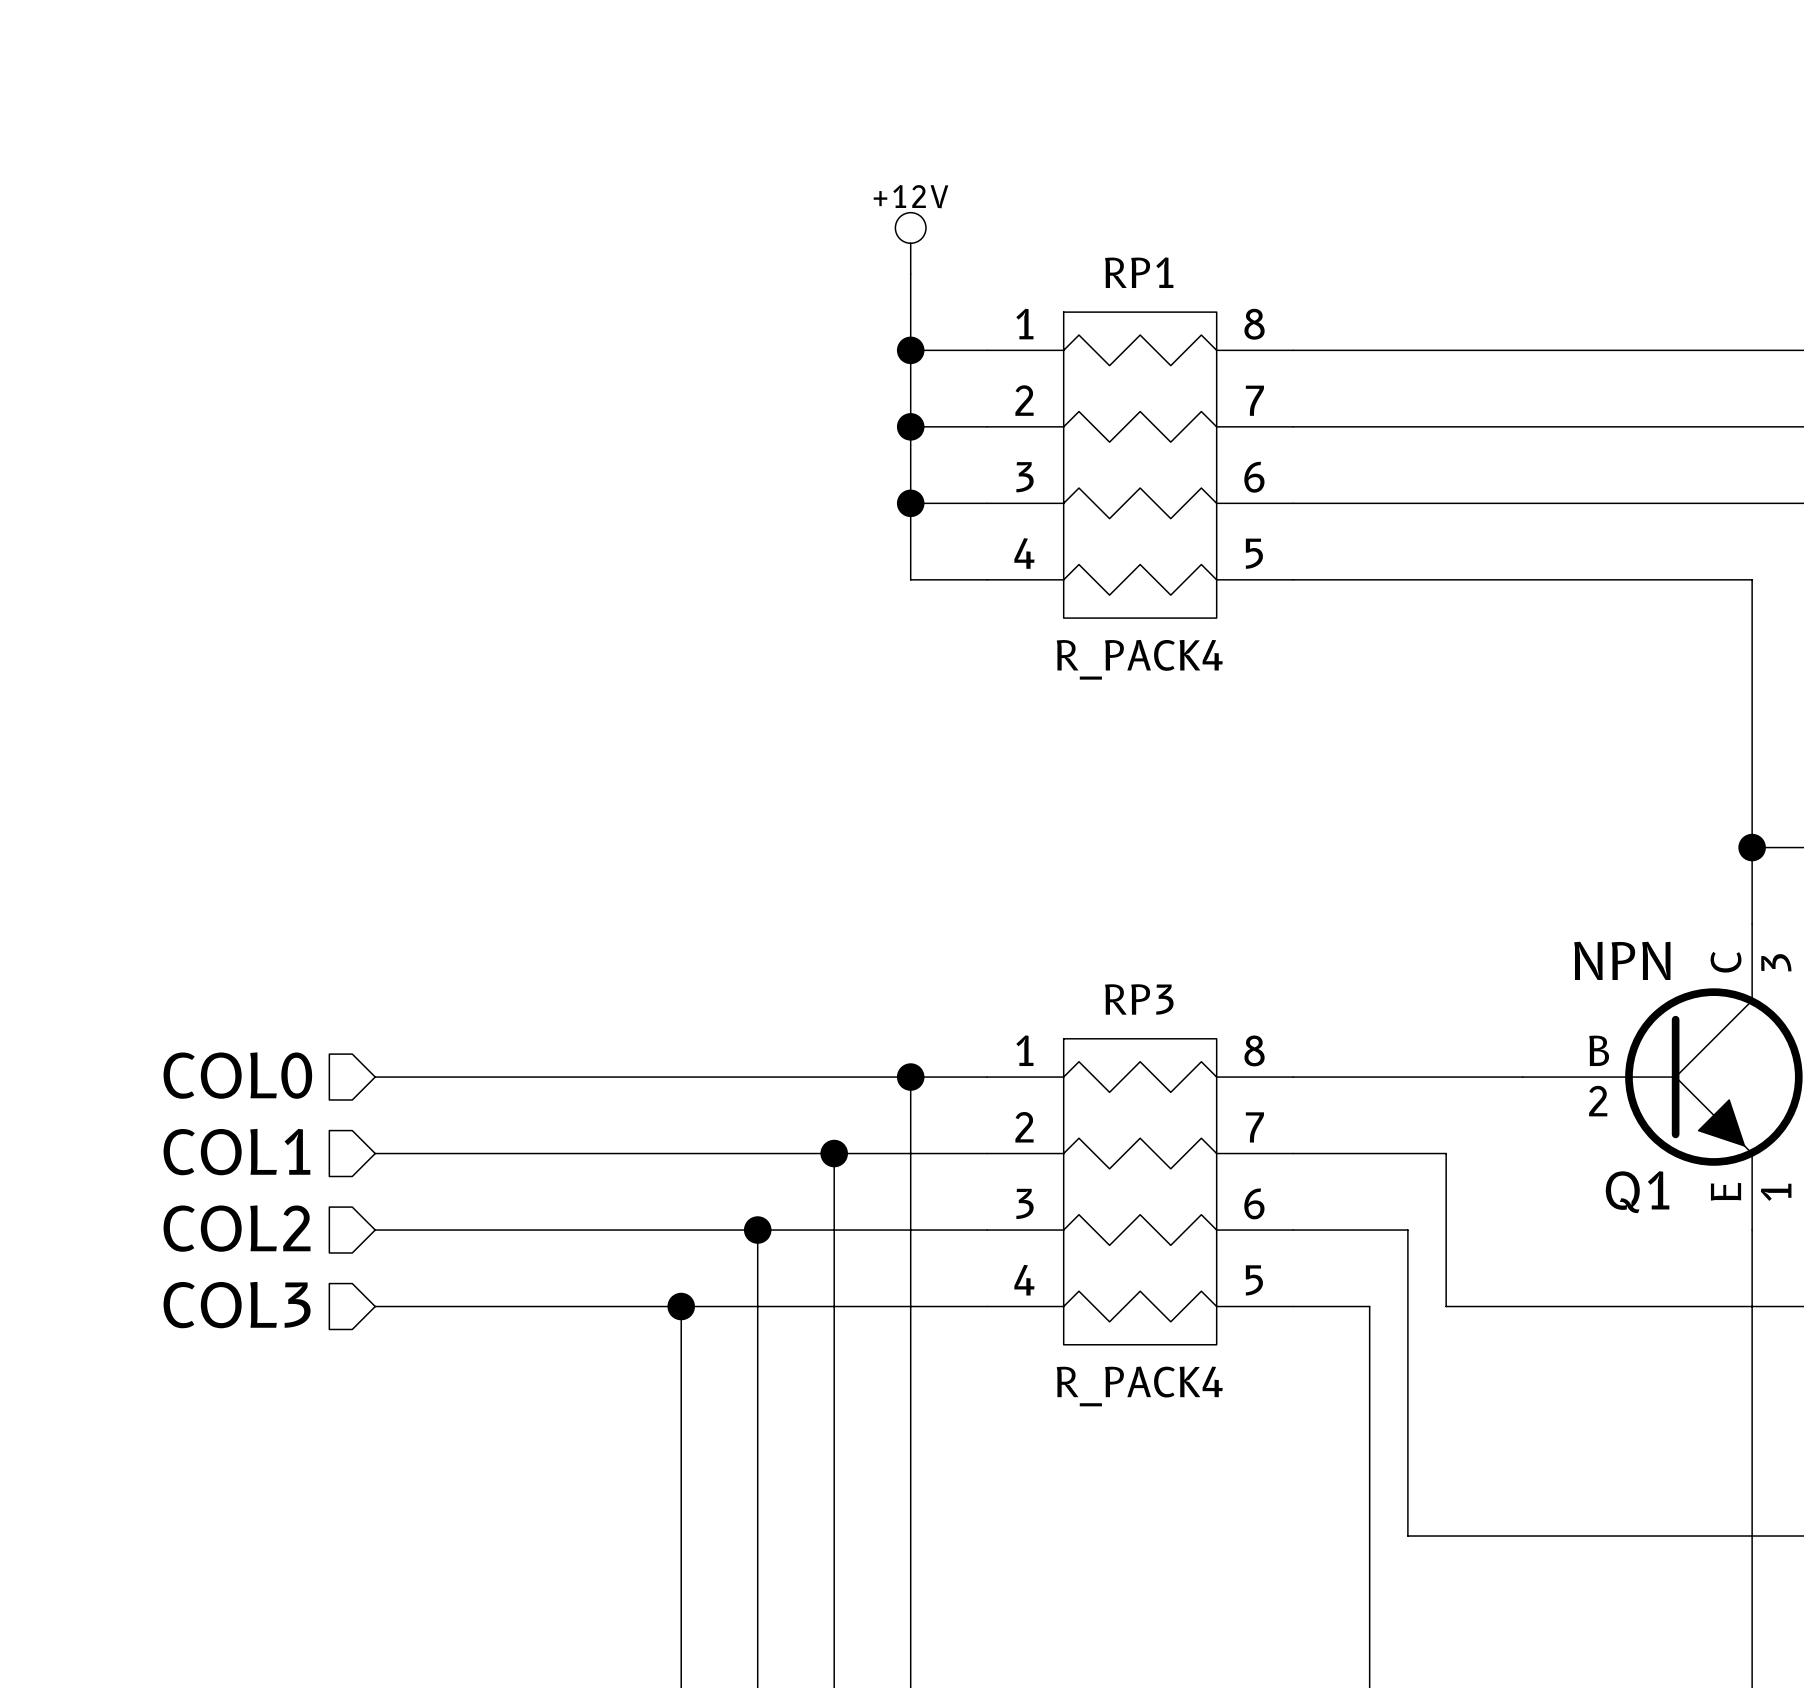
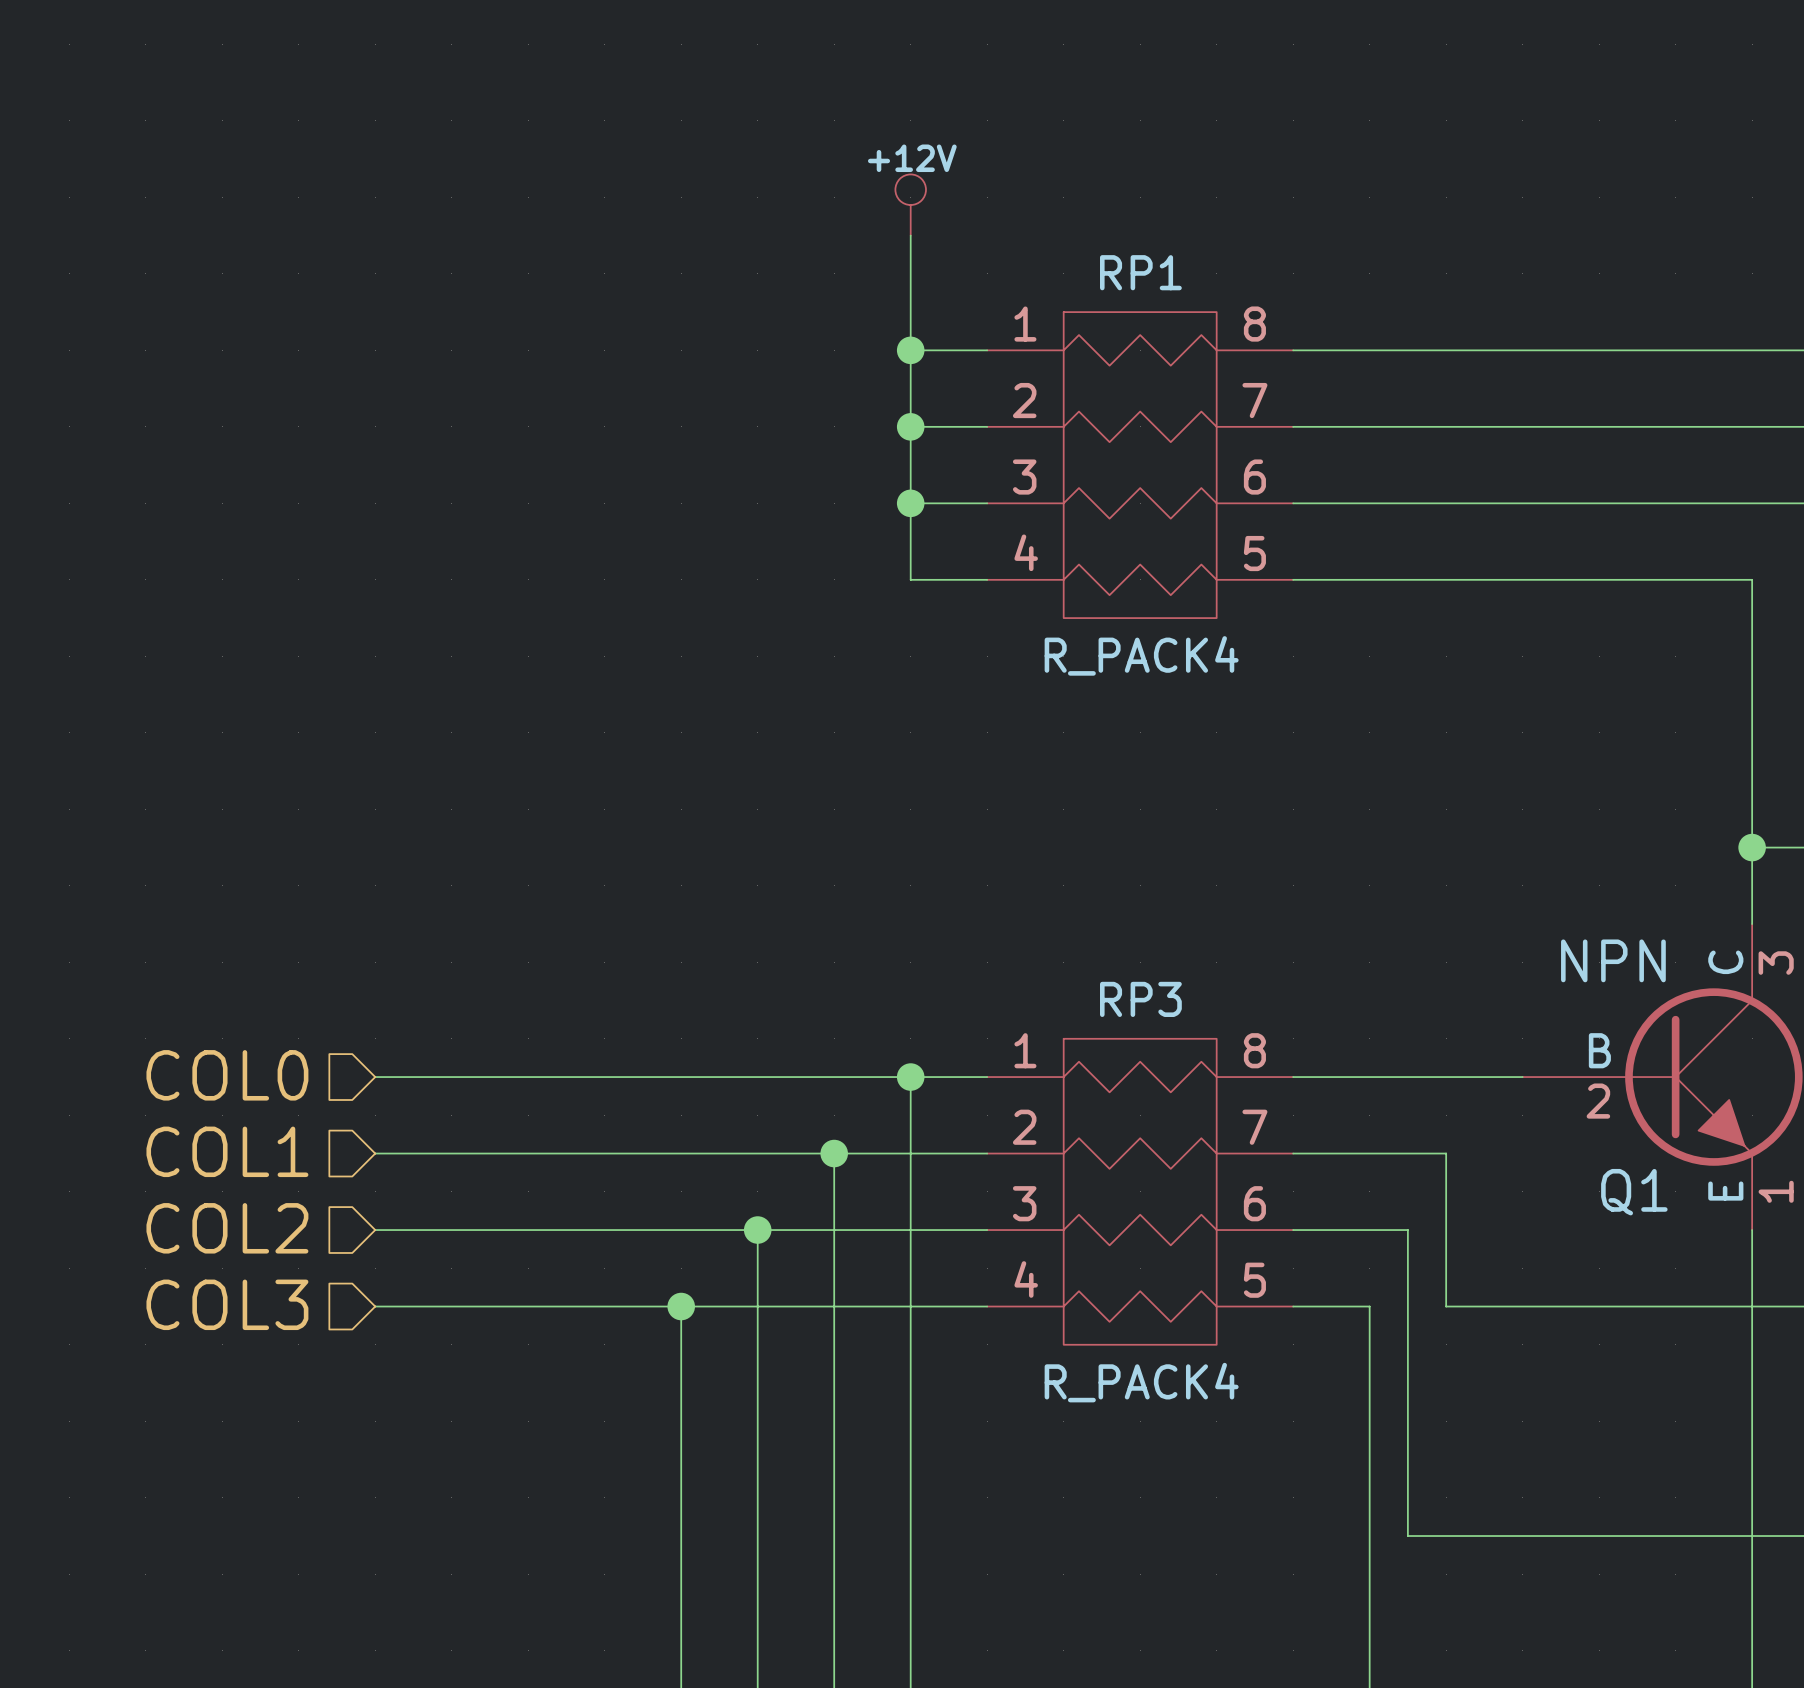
power symbol position: +12V (910, 243) -> +12V (910, 205)

